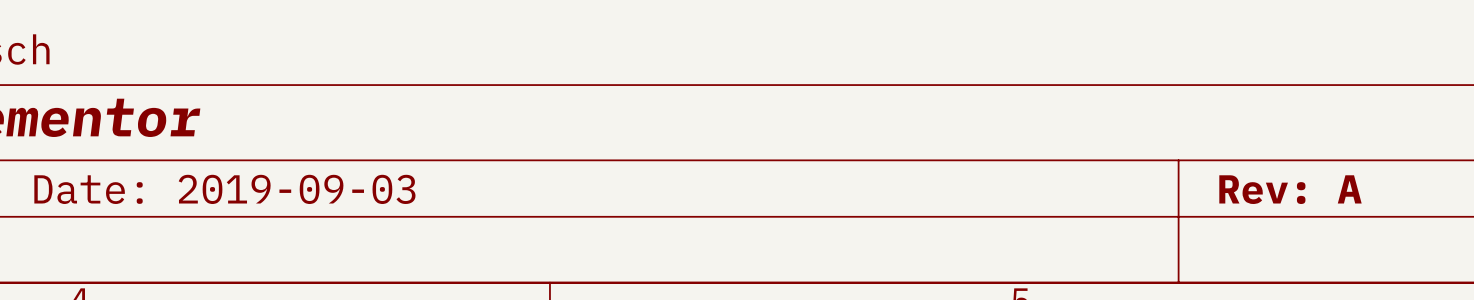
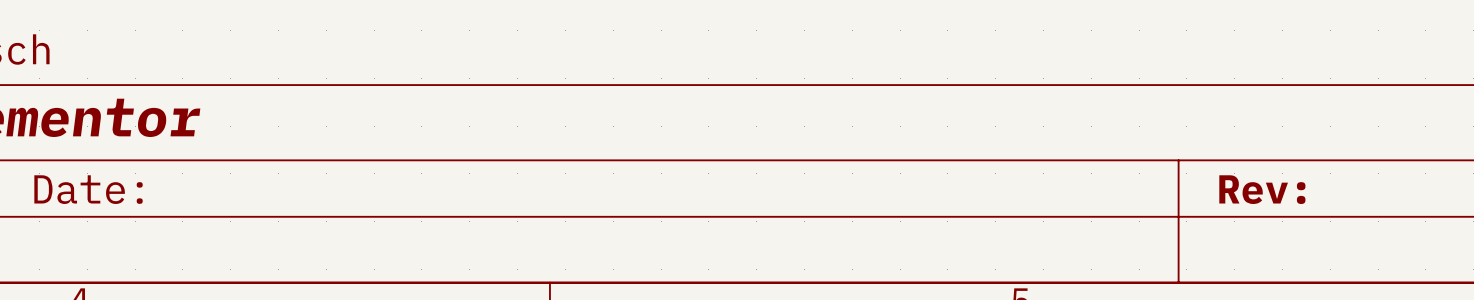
title block: Date: 2019-09-03 (224, 189) -> Date: (88, 189)
title block: Rev: A (1290, 189) -> Rev: (1262, 189)

